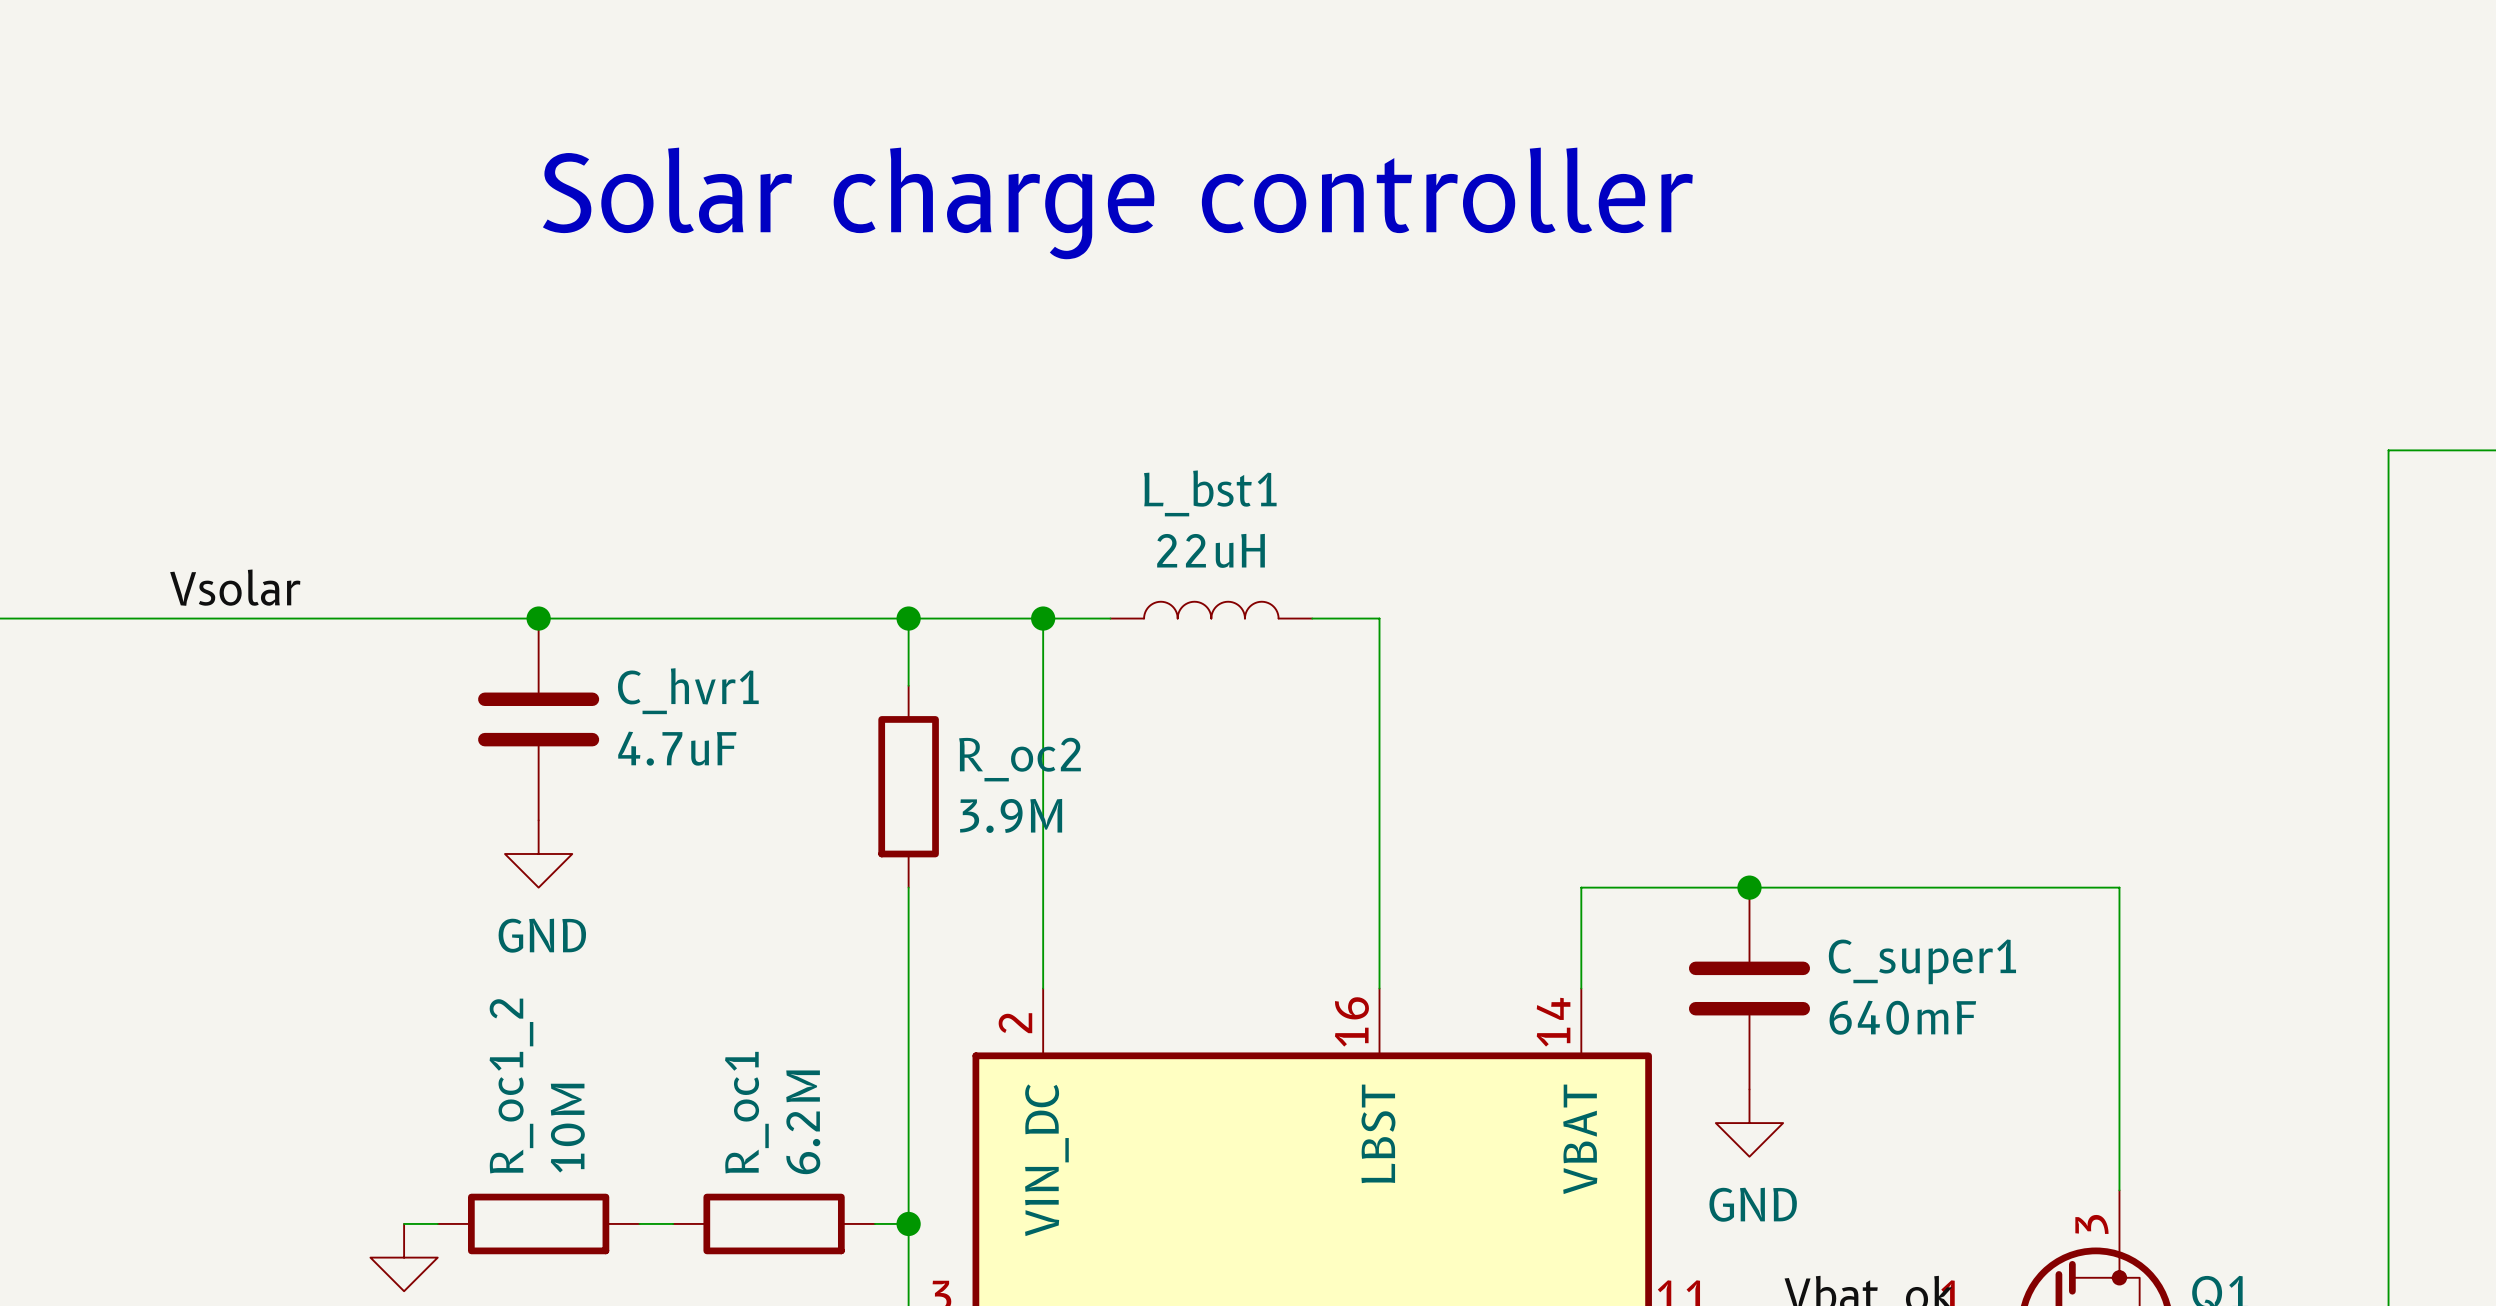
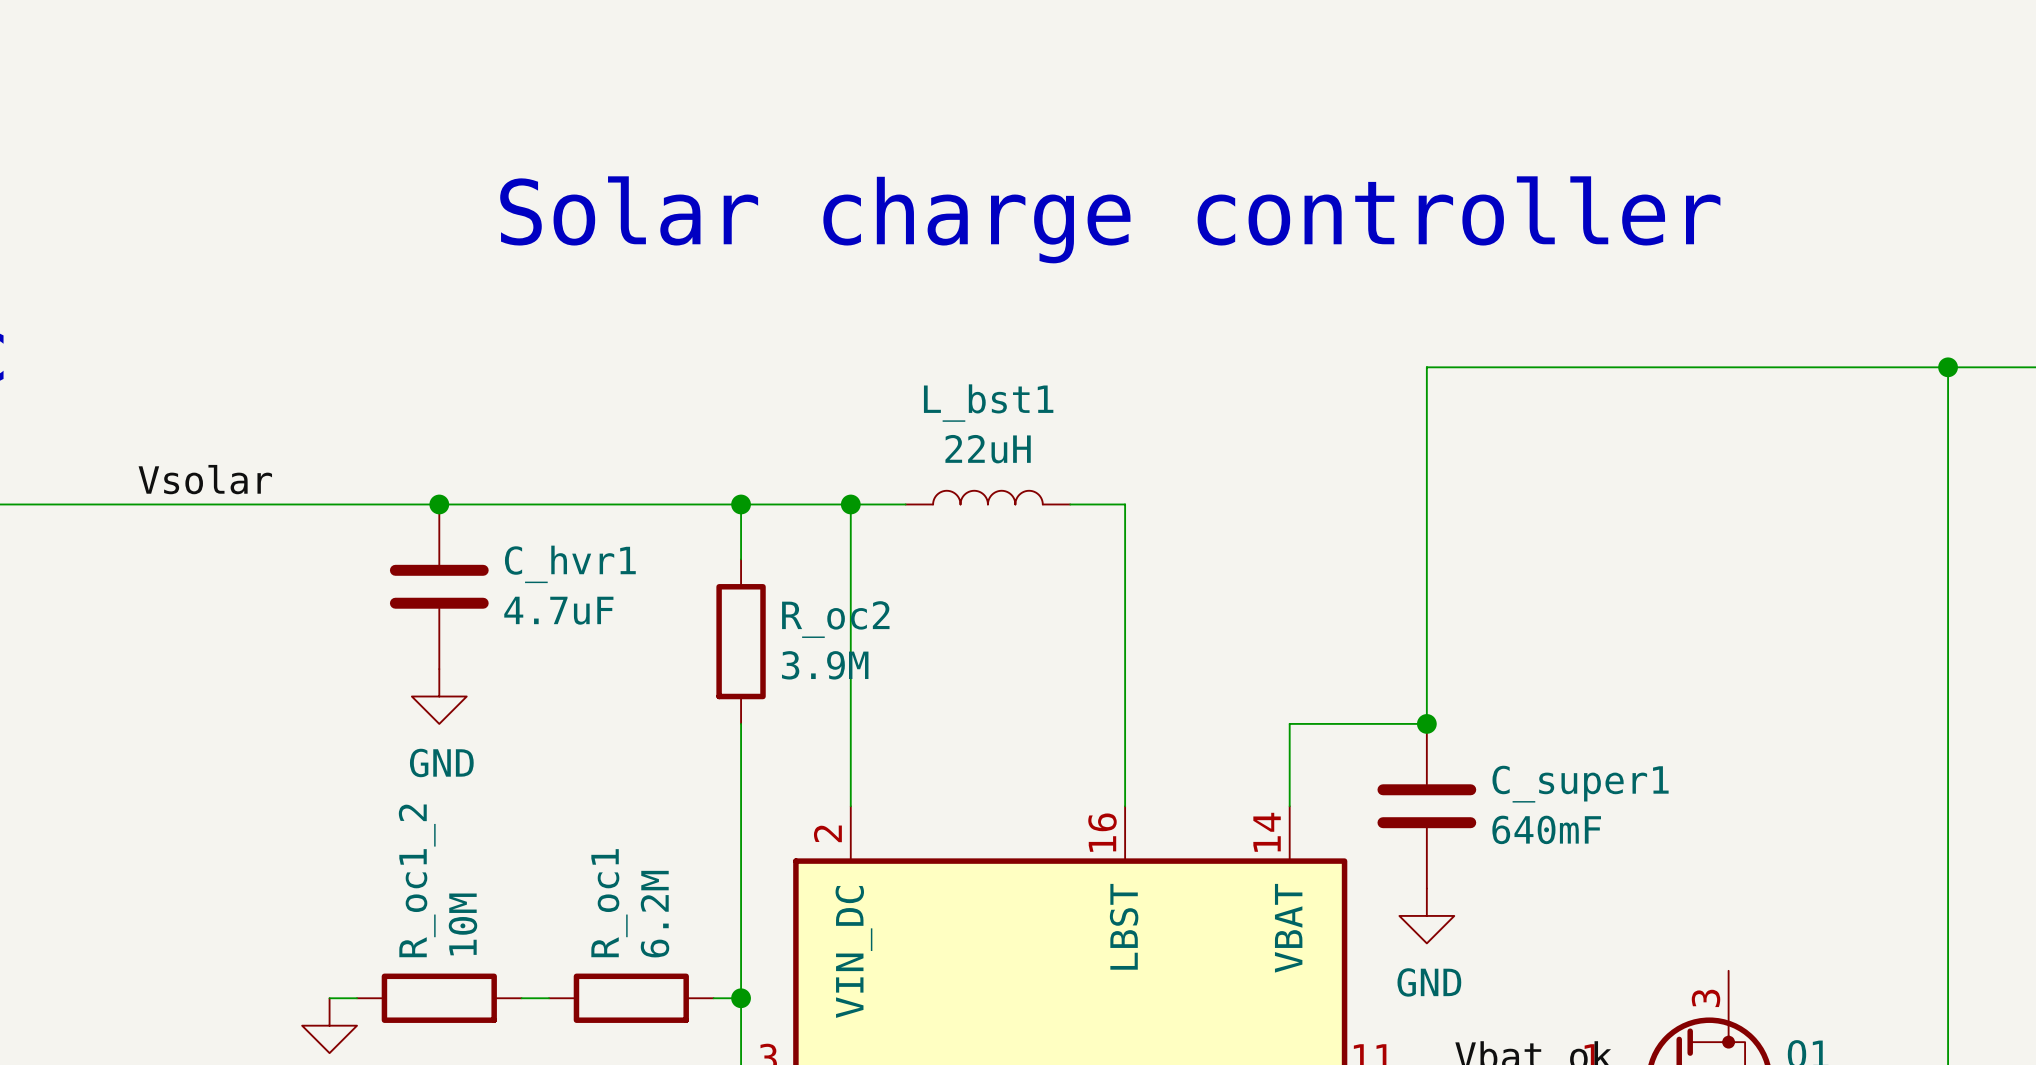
text position: Solar charge controller (1117, 203) -> Solar charge controller (1110, 219)
junction: none -> (1948, 367)
wire: (1749, 887) (2119, 887) (2119, 1190) -> (1426, 723) (1426, 367) (1948, 367)

